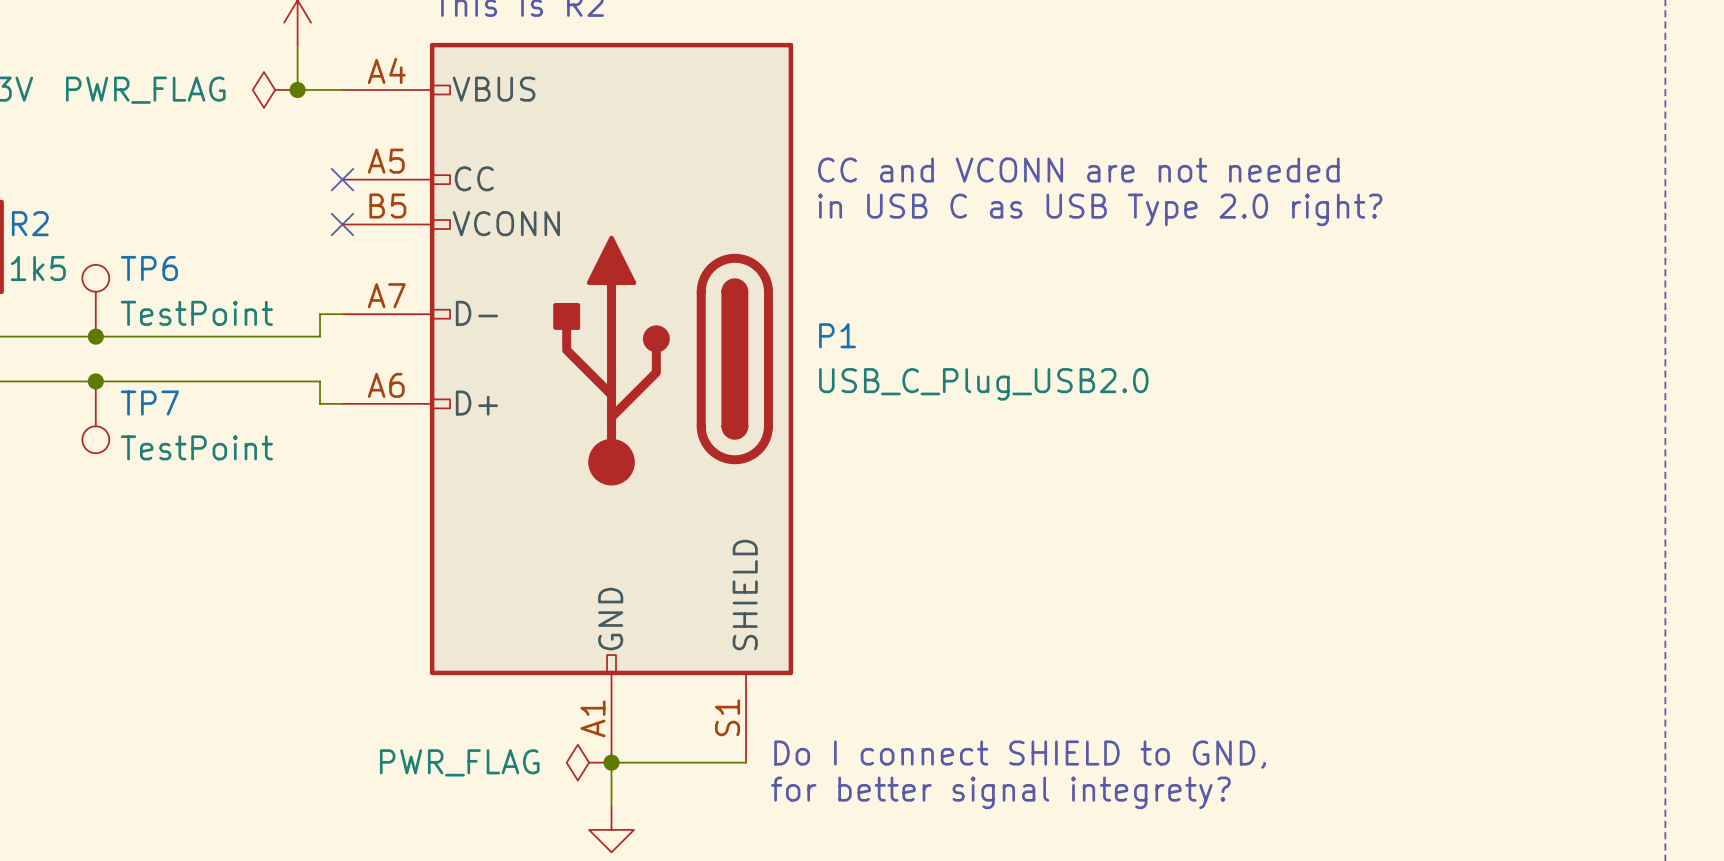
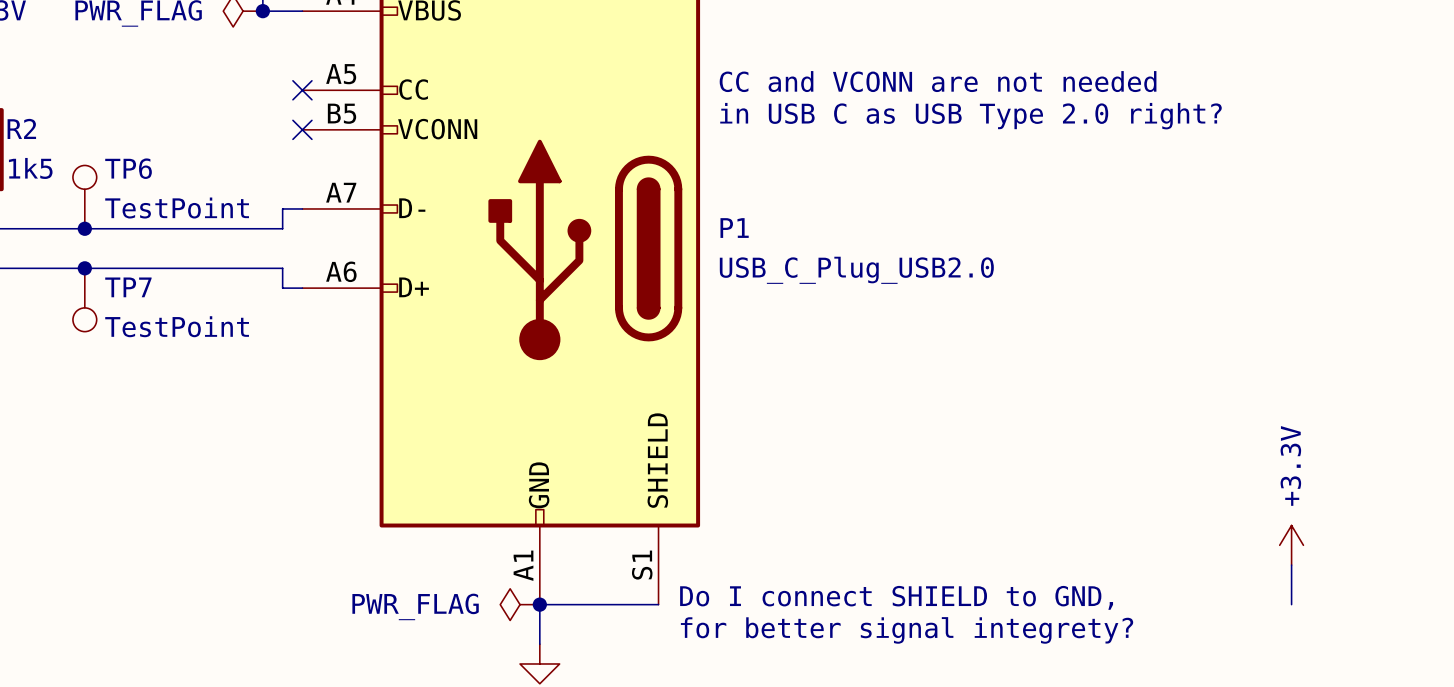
power symbol: none -> +3.3V (1291, 545)
wire: none -> (1291, 565) (1291, 604)

